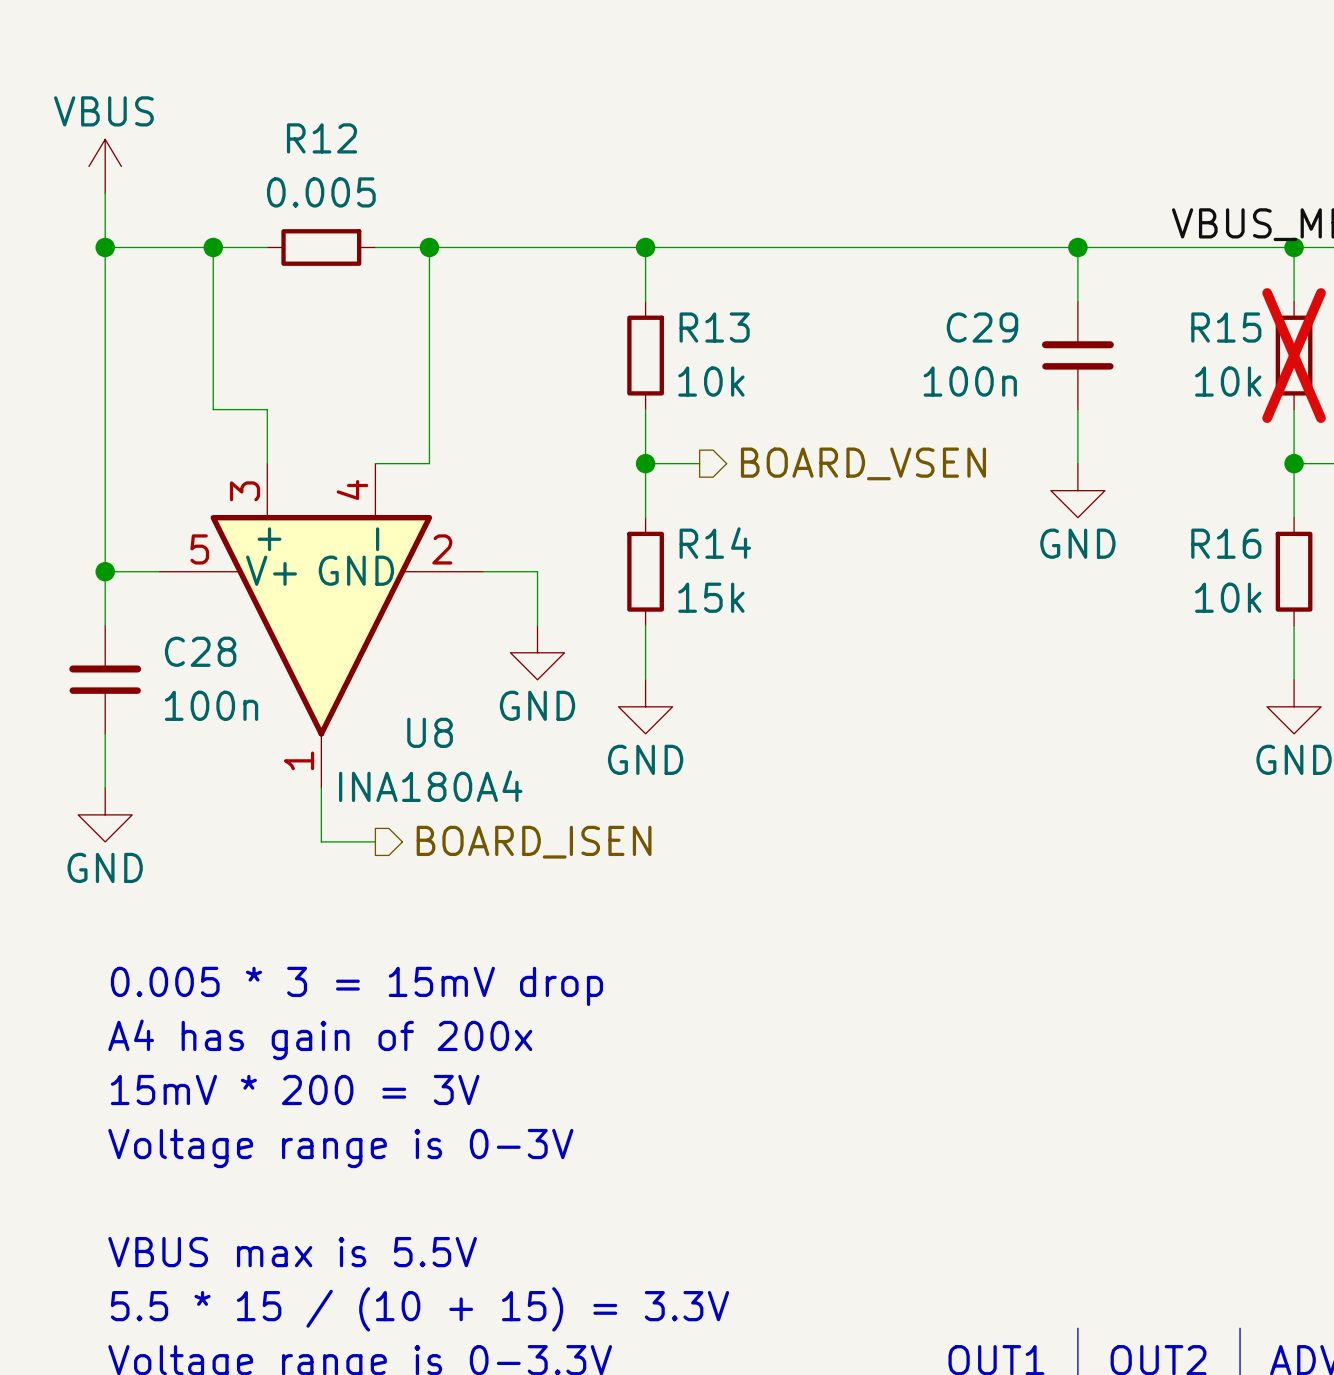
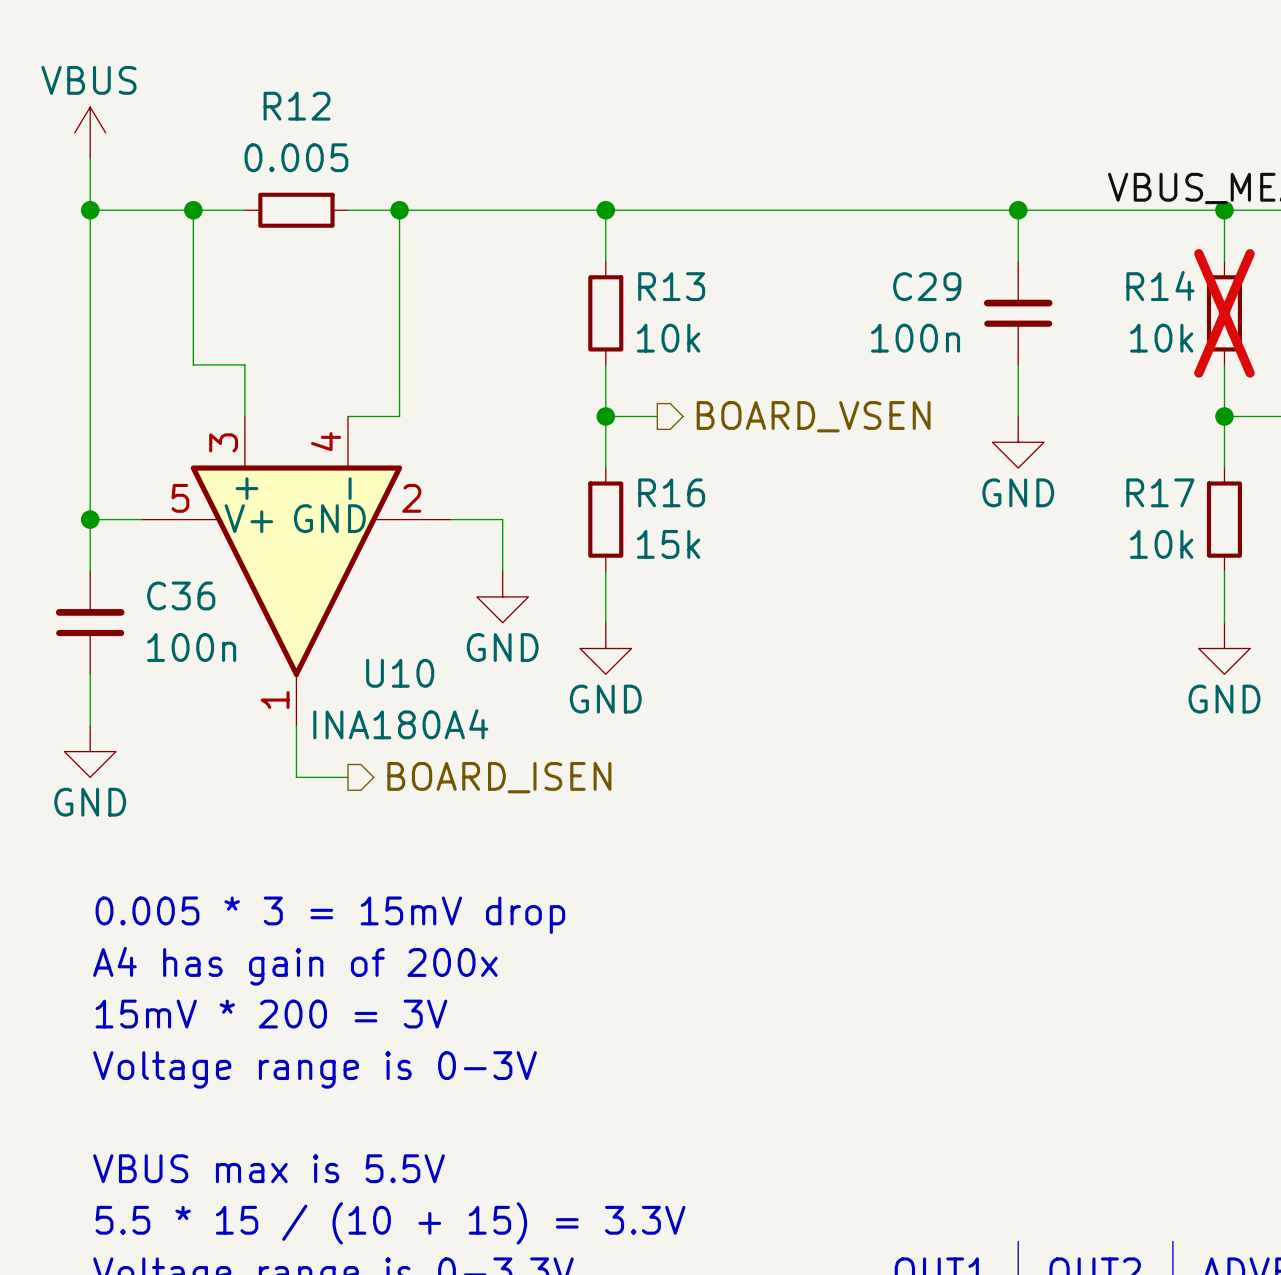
R15 name: R15 (1226, 327) -> R14 (1160, 286)
R14 name: R14 (715, 543) -> R16 (671, 492)
R16 name: R16 (1226, 543) -> R17 (1160, 492)
C28 name: C28 (200, 651) -> C36 (181, 595)
U8 name: U8 (430, 732) -> U10 (400, 673)

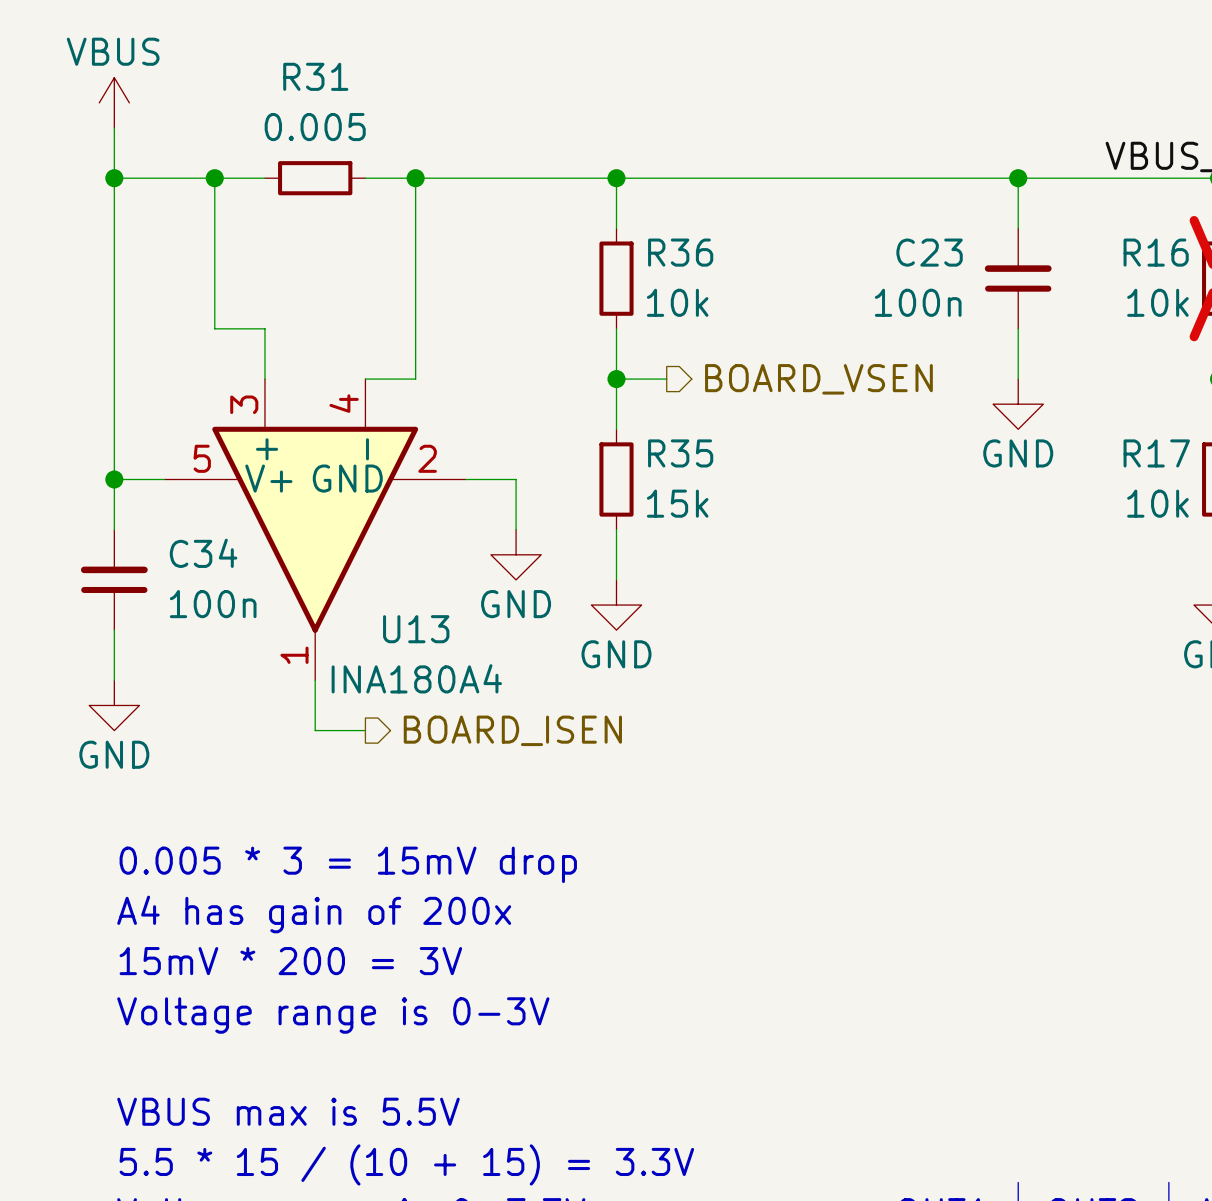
R12 name: R12 (297, 106) -> R31 (315, 76)
R13 name: R13 (671, 286) -> R36 (680, 252)
C29 name: C29 (927, 286) -> C23 (929, 252)
R14 name: R14 (1160, 286) -> R16 (1156, 252)
R16 name: R16 (671, 492) -> R35 (680, 453)
C36 name: C36 (181, 595) -> C34 (203, 553)
U10 name: U10 (400, 673) -> U13 (416, 629)

